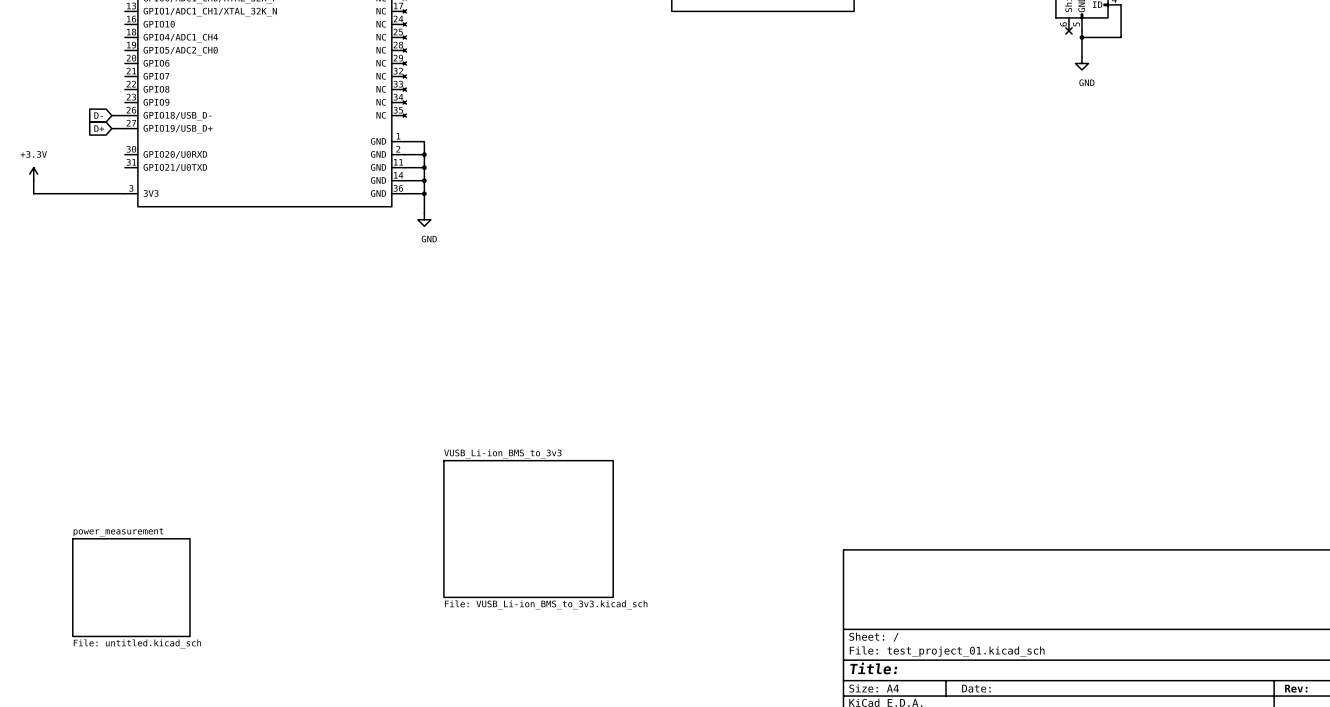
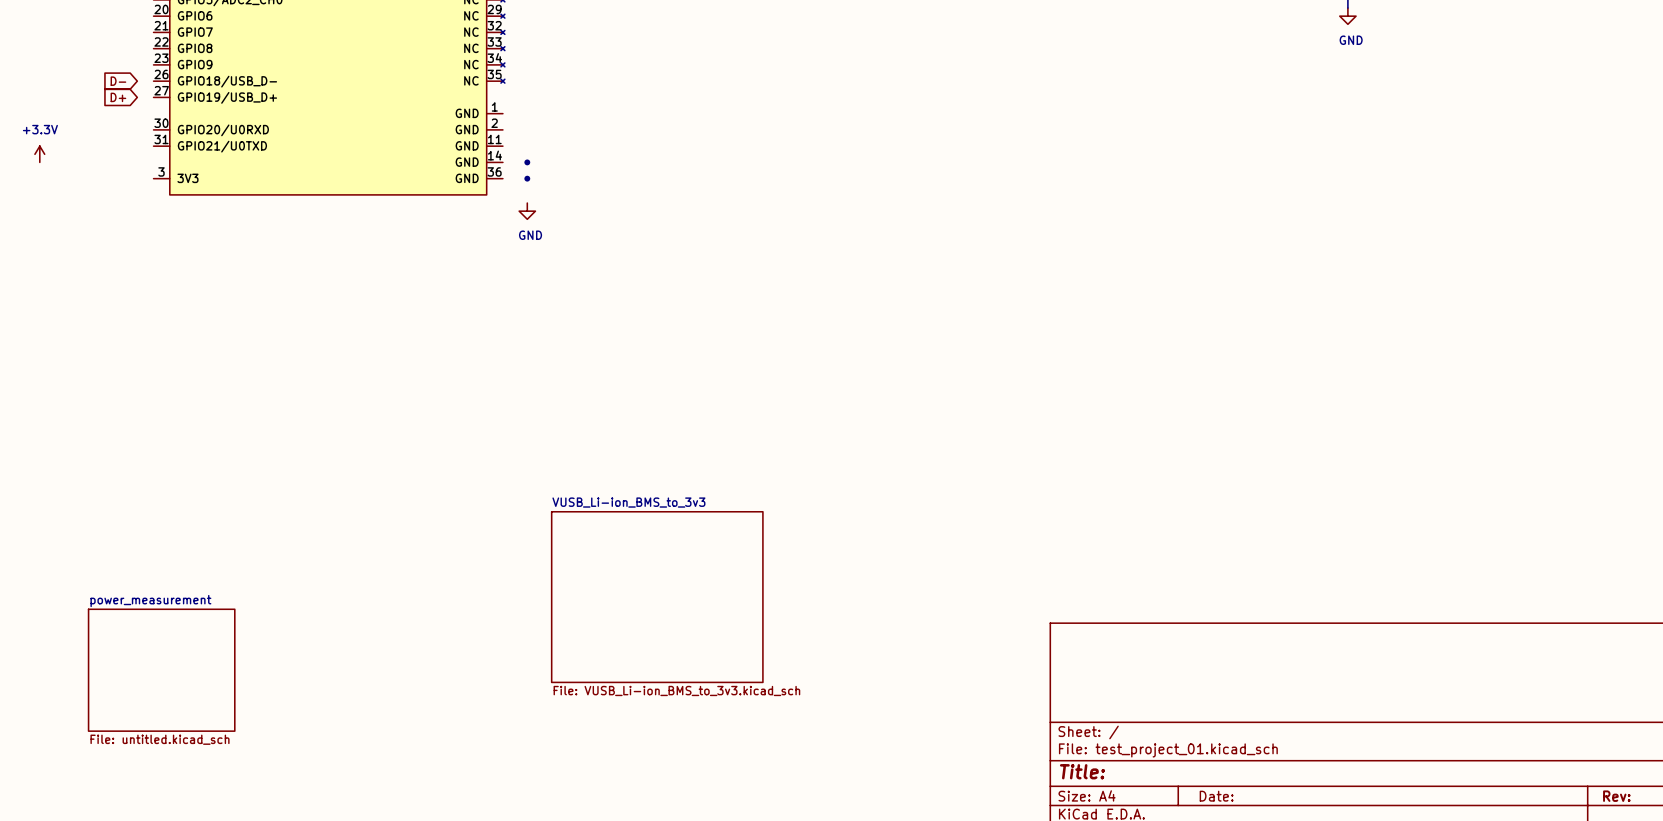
wire: (111, 115) (124, 115) -> none
wire: (111, 128) (124, 128) -> none
wire: (404, 141) (424, 141) (424, 213) -> none
wire: (404, 154) (424, 154) -> none
junction: (424, 154) -> none
wire: (404, 167) (424, 167) -> none
junction: (424, 167) -> none
wire: (33, 180) (33, 193) (124, 193) -> none
wire: (404, 180) (424, 180) -> none
wire: (404, 193) (424, 193) -> none

